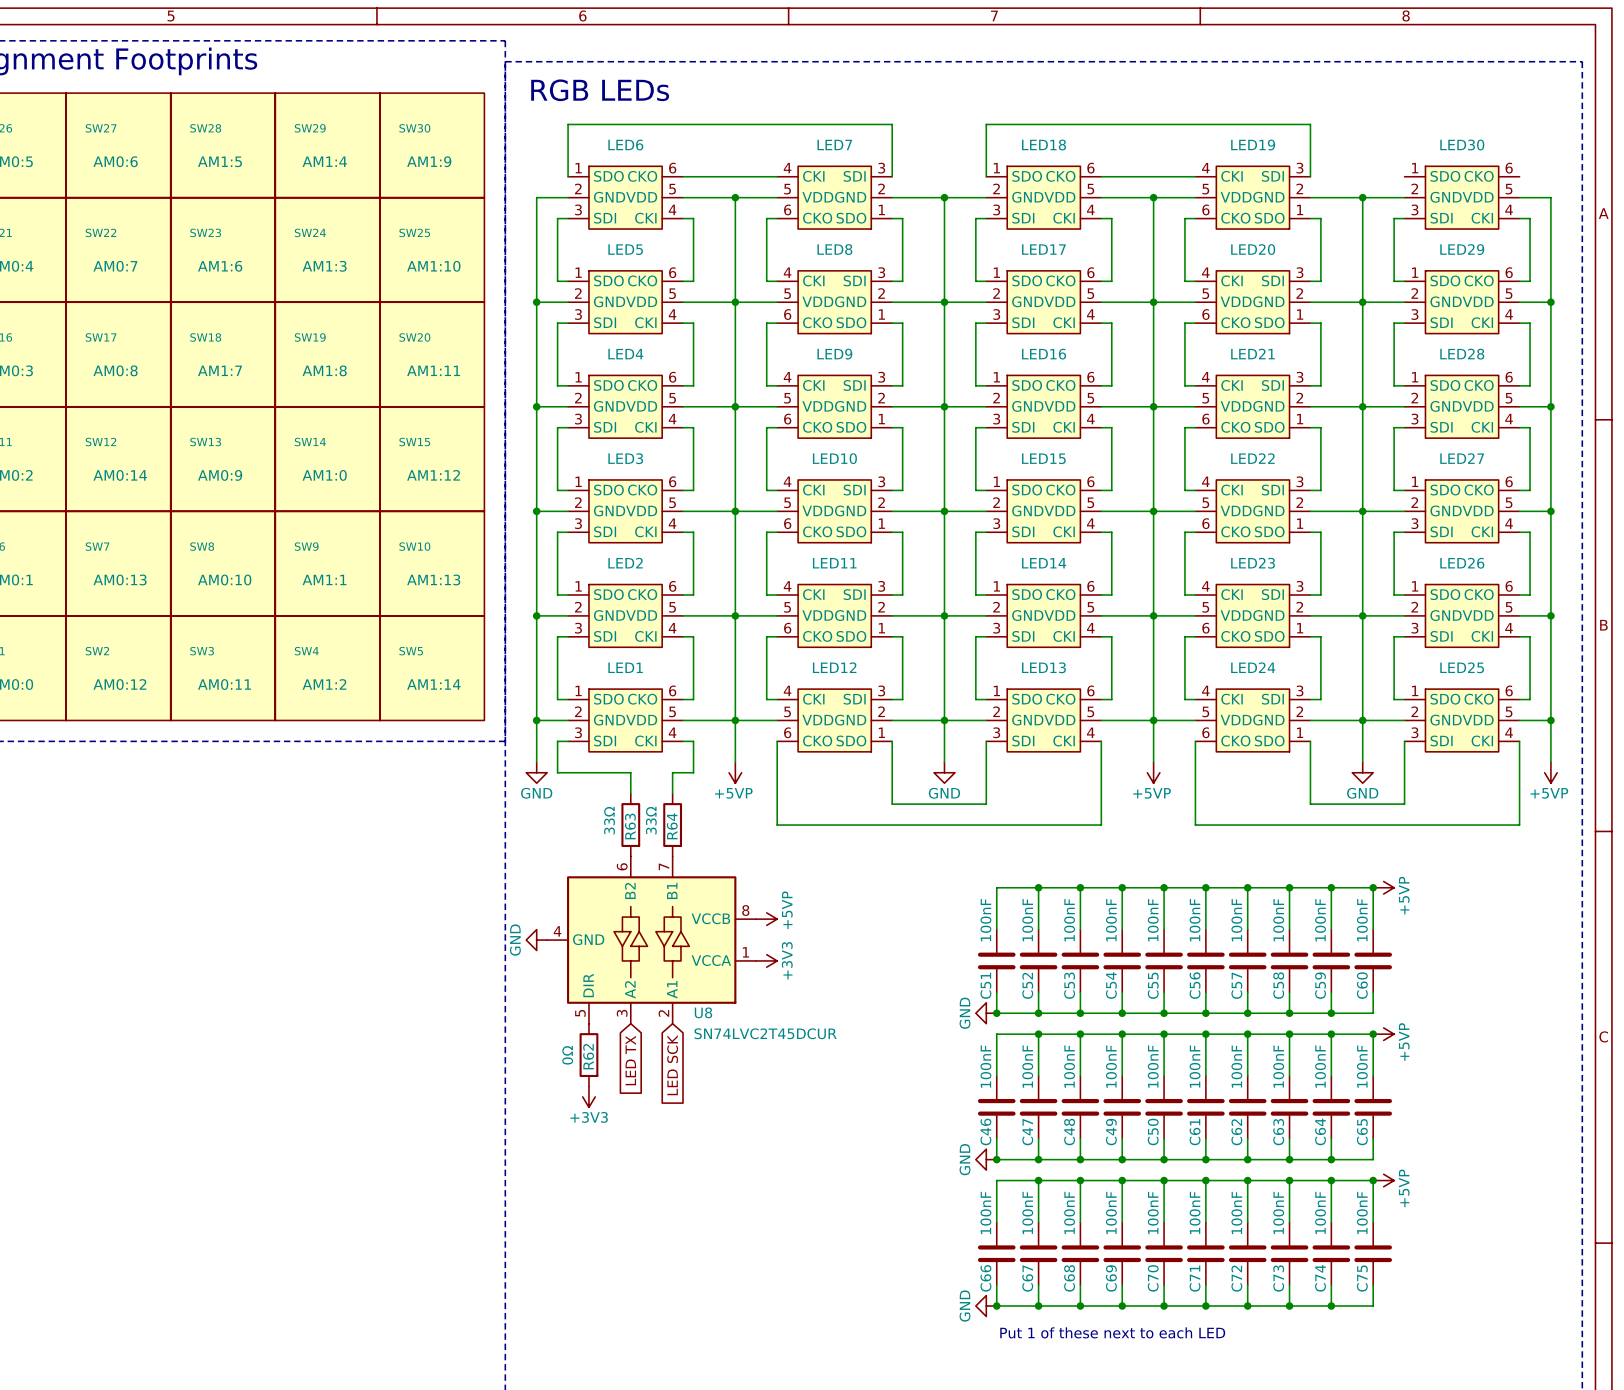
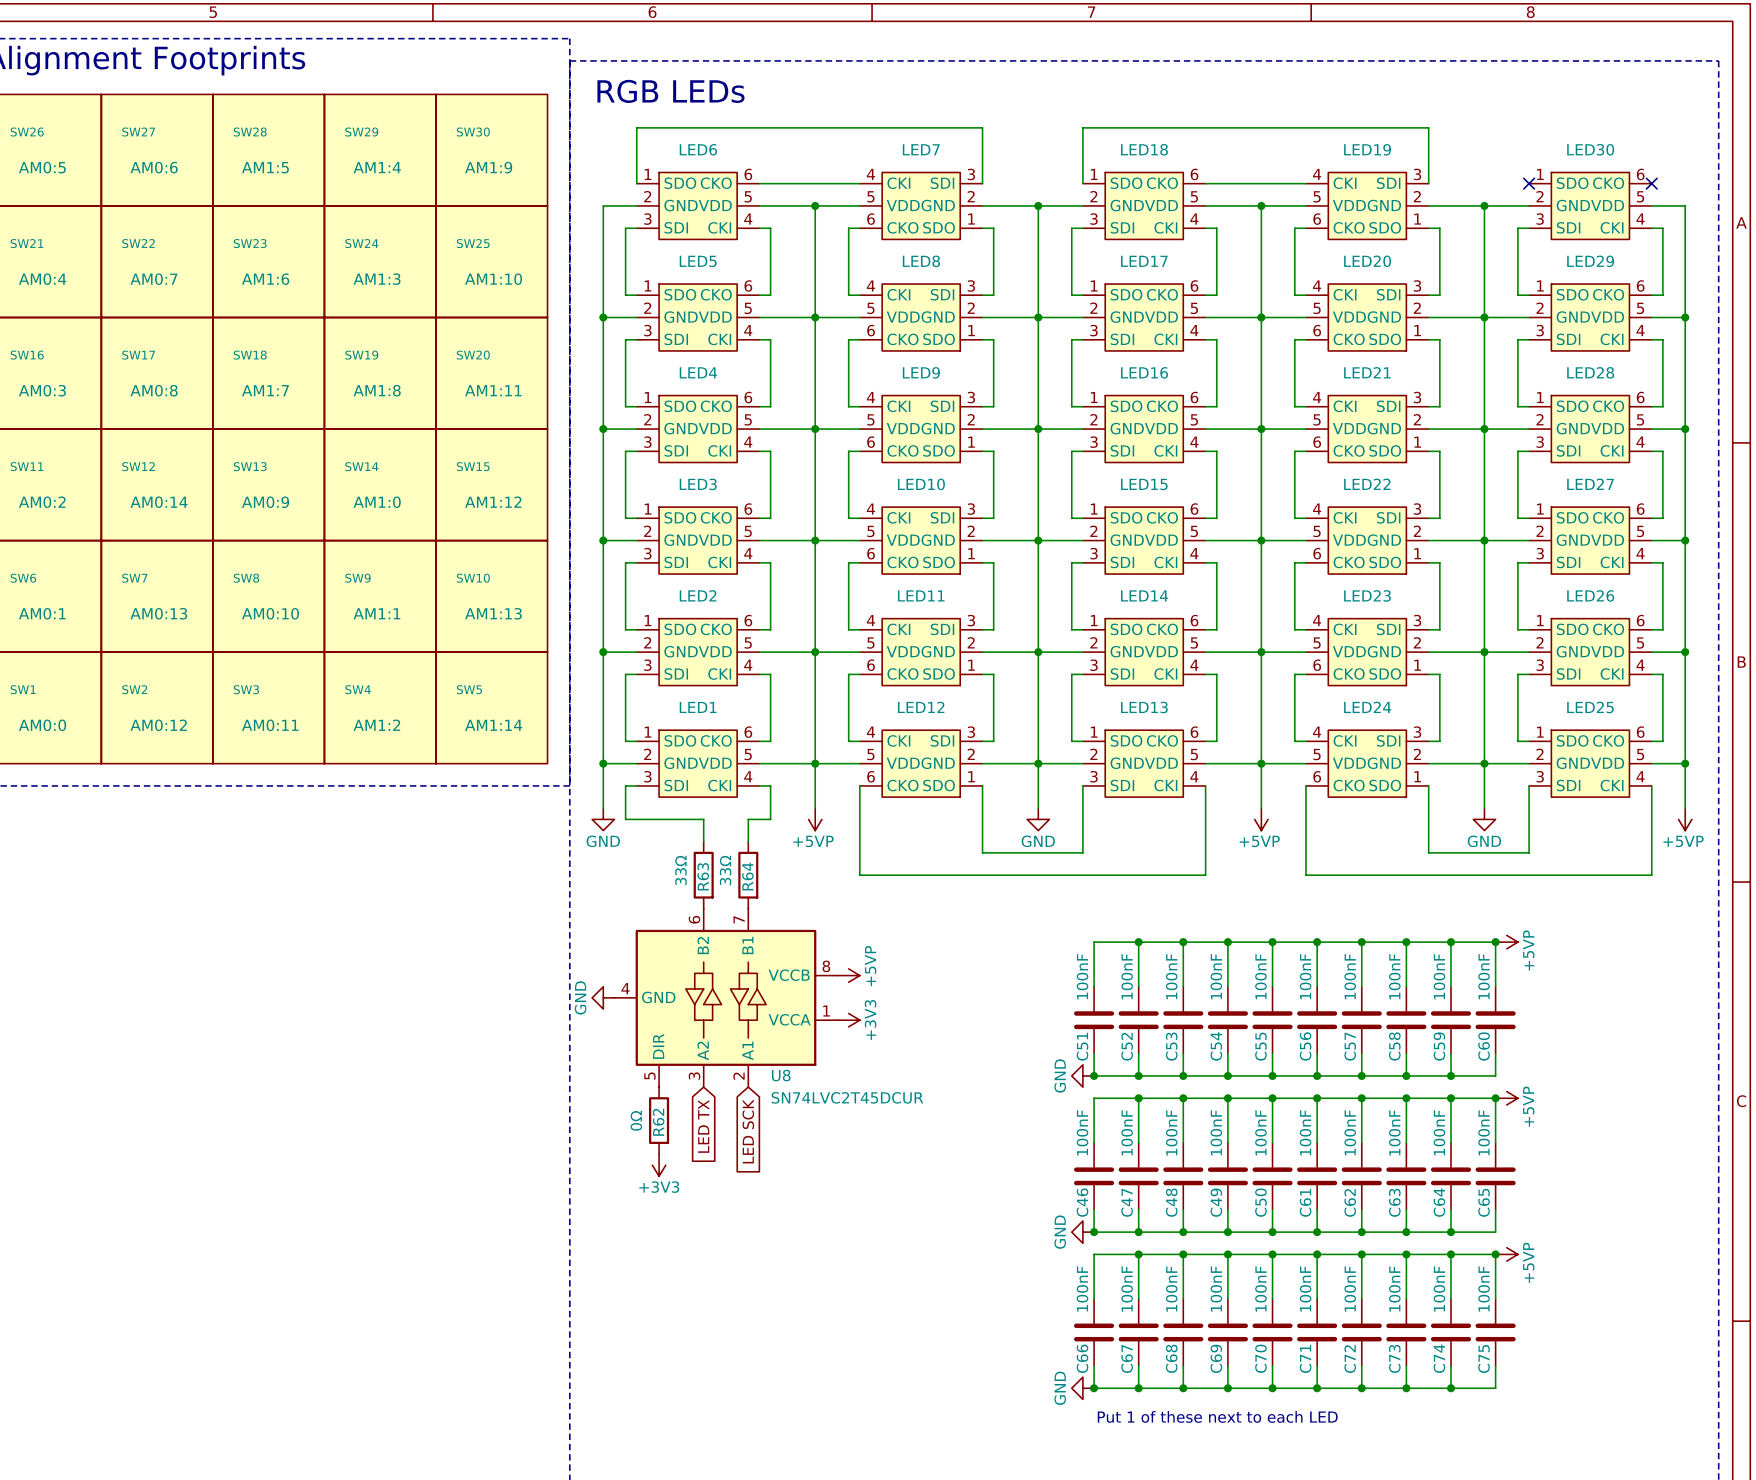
no-connect mark: none -> (1529, 183)
no-connect mark: none -> (1651, 183)

